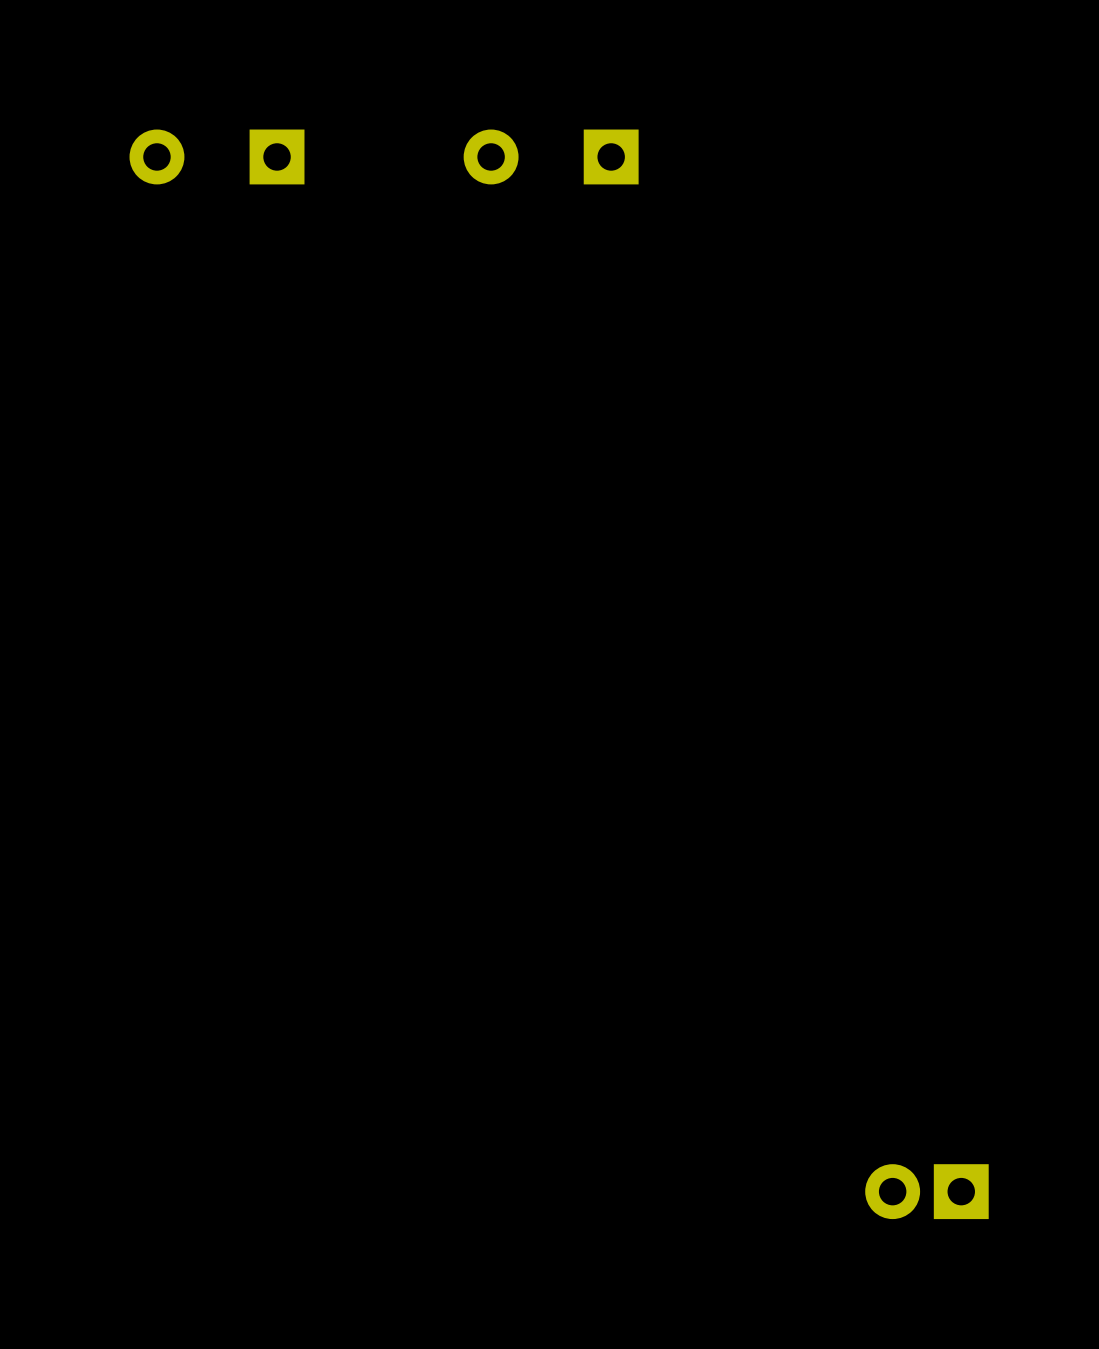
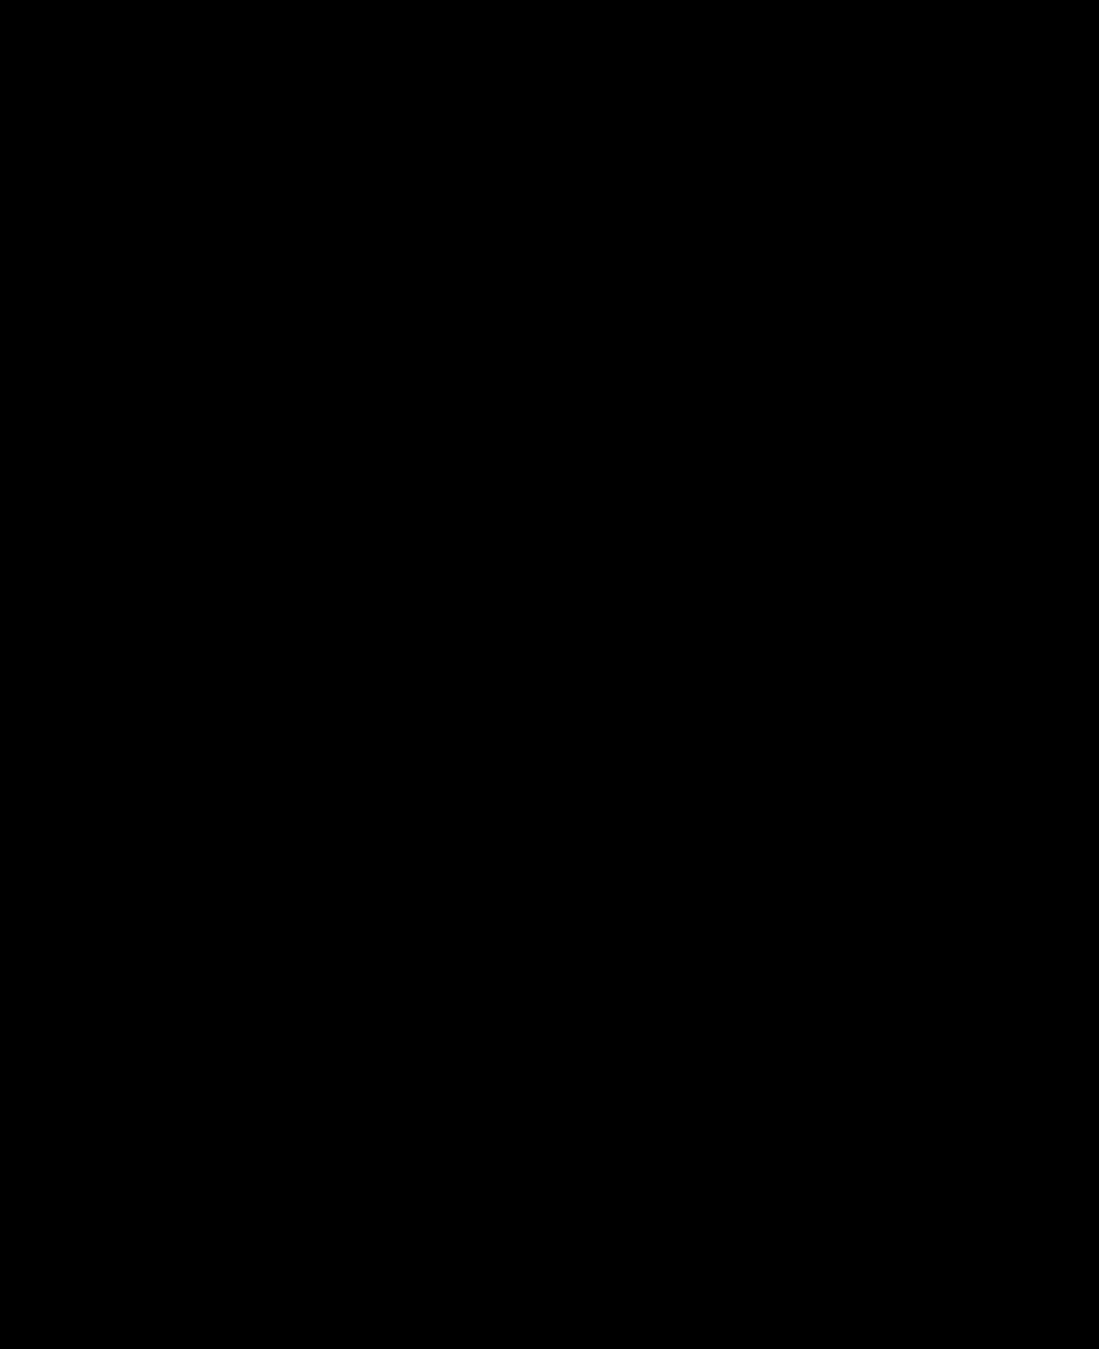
part: (217, 156) -> none
part: (551, 156) -> none
part: (926, 1191) -> none

